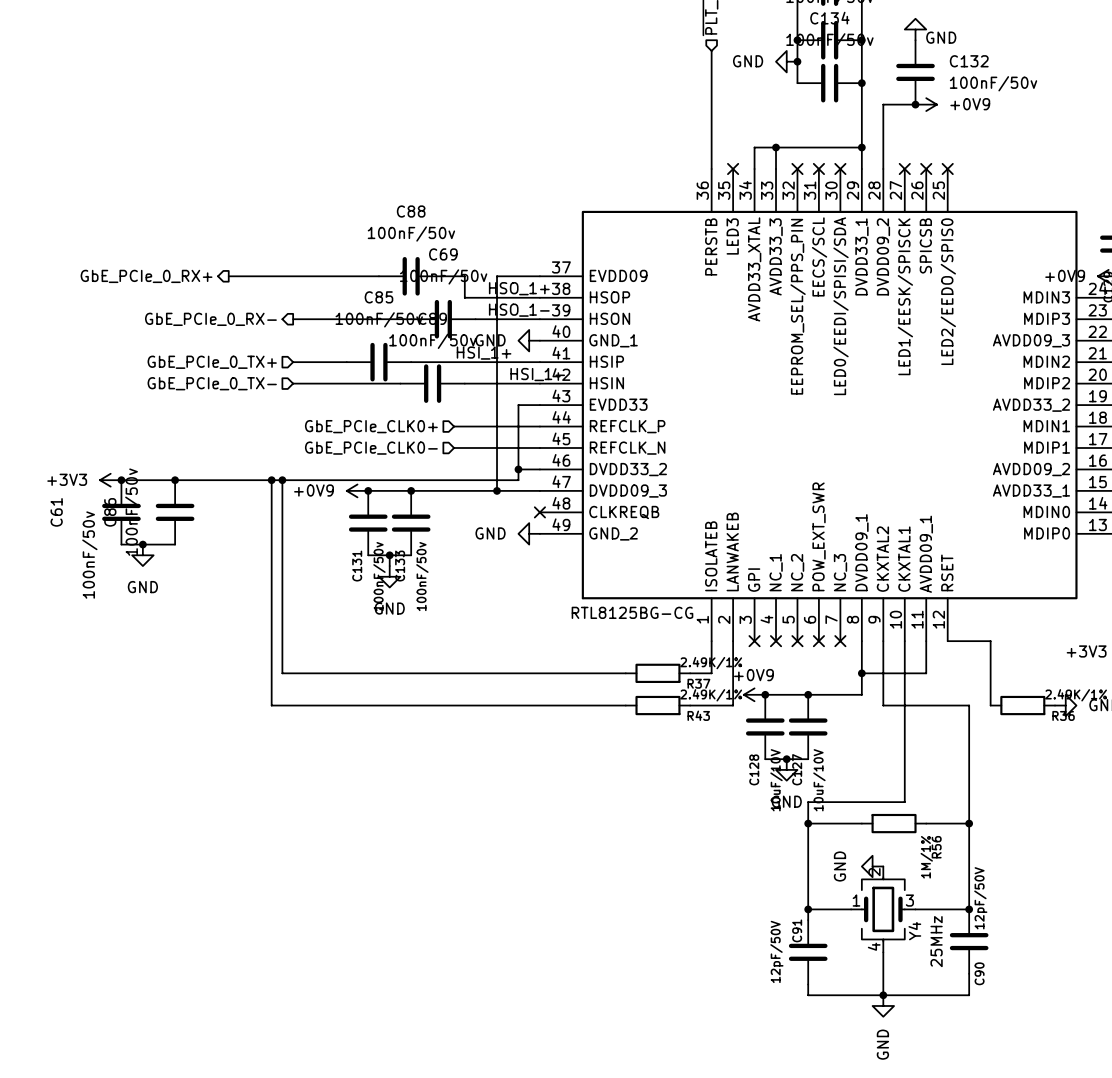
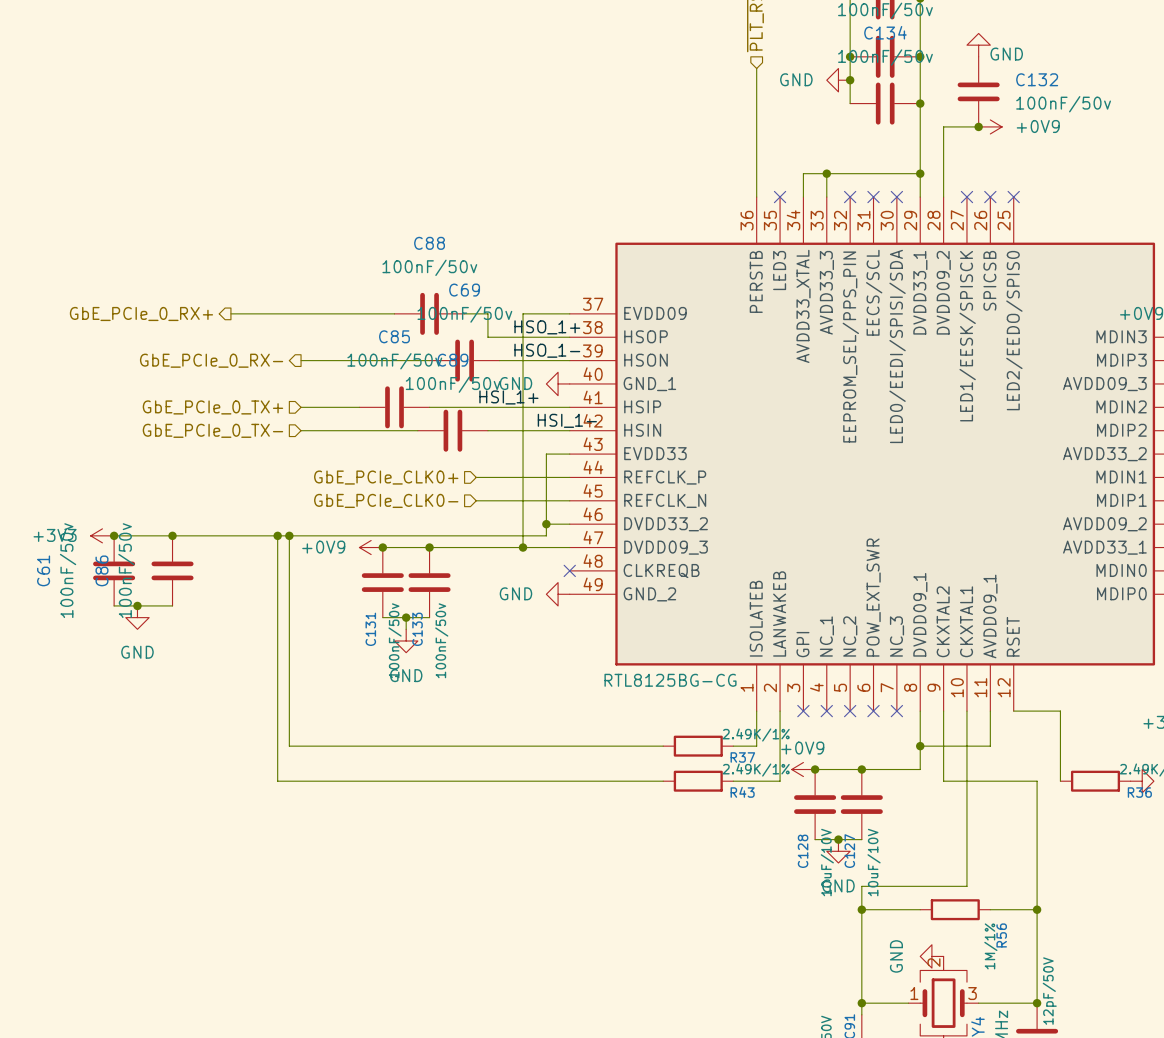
C61 value position: 100nF/50v (89, 555) -> 100nF/50v (68, 570)

